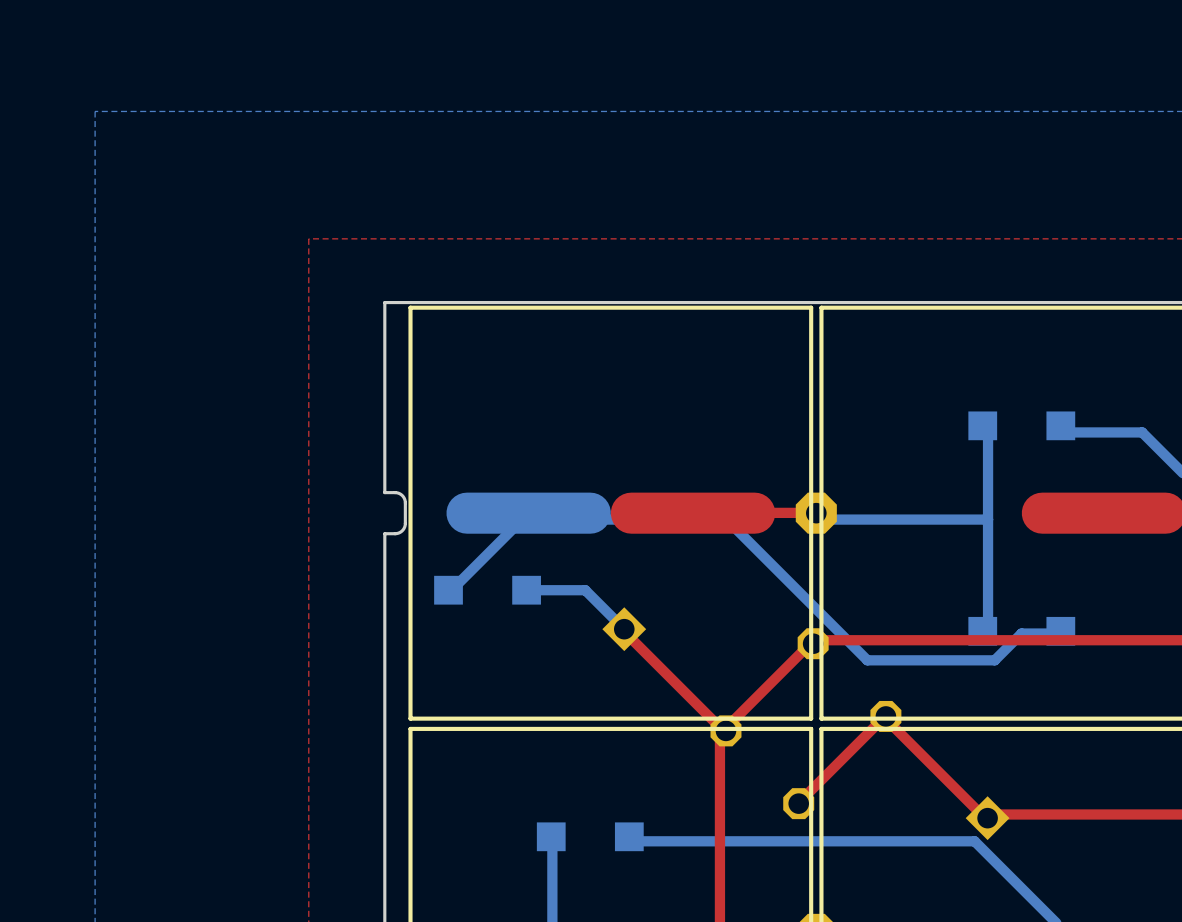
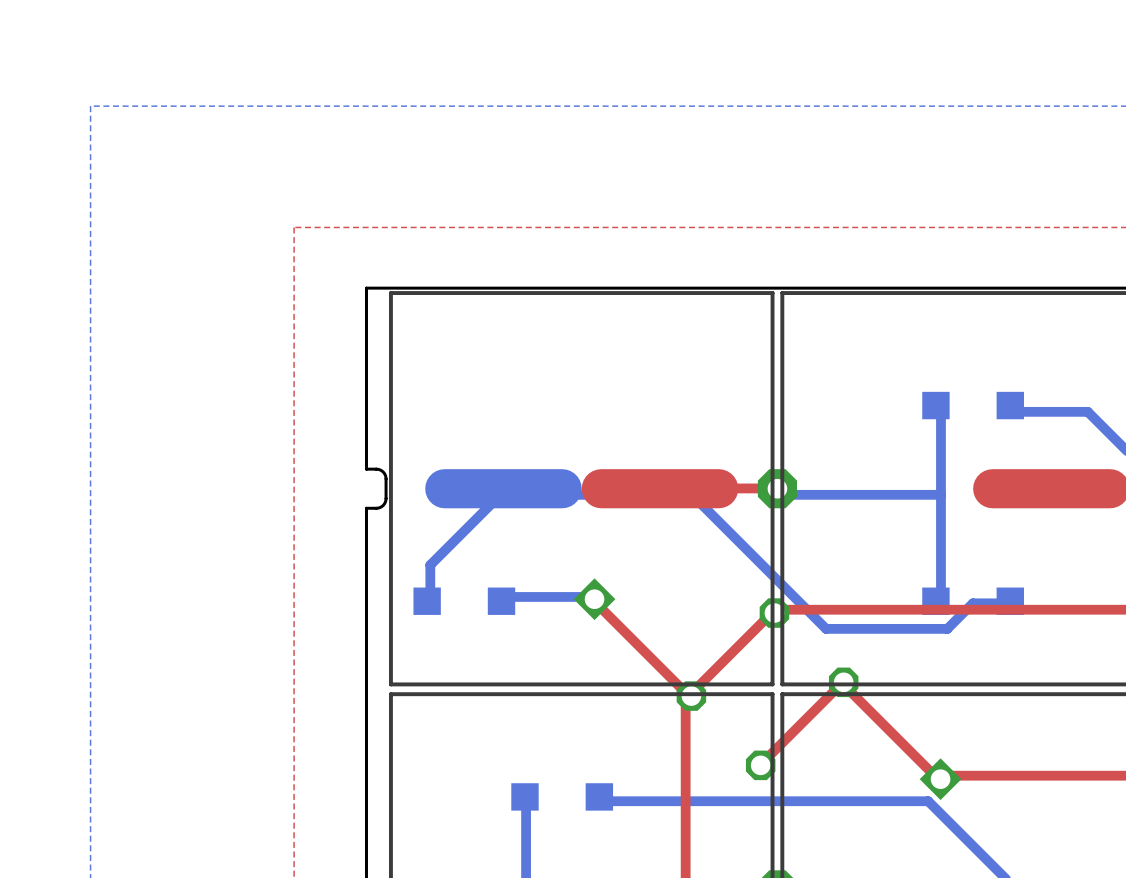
bottom track: (528, 513) (451, 590) (448, 590) -> (503, 488) (500, 494) (430, 565) (430, 596) (427, 601)
part position: (487, 590) -> (464, 601)
bottom track: (526, 590) (585, 590) (624, 629) -> (501, 601) (506, 596) (589, 596) (594, 599)

